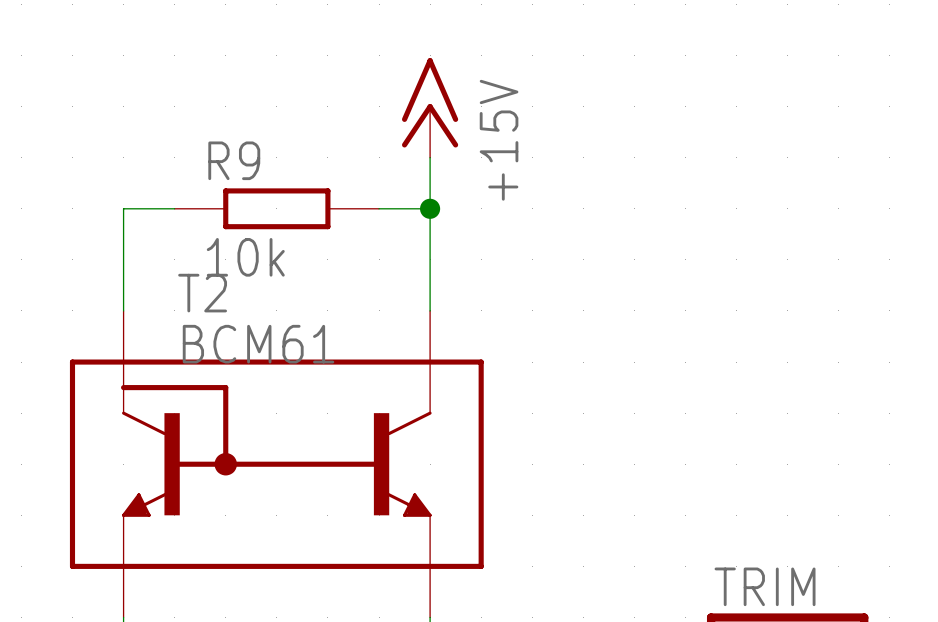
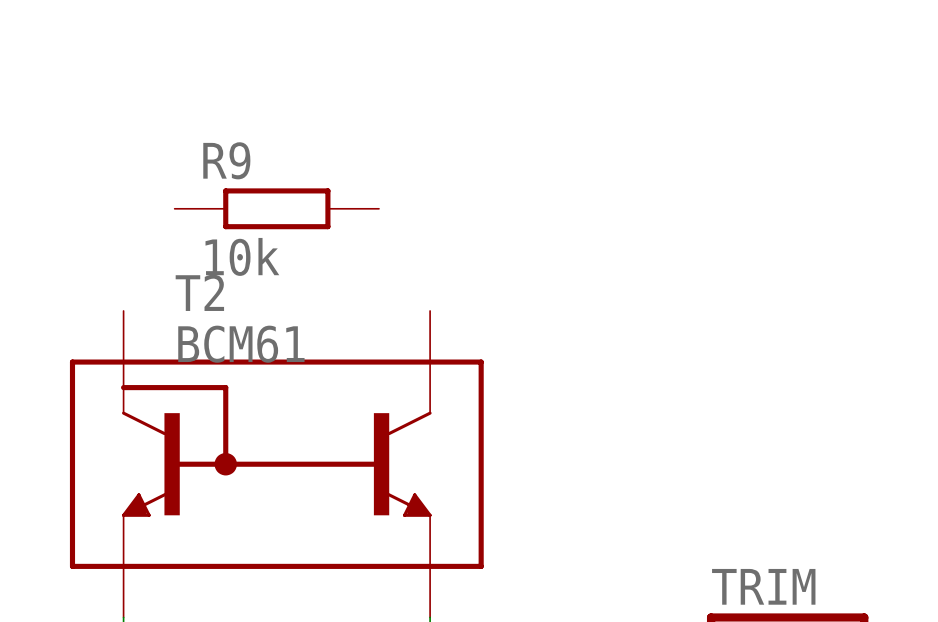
power symbol: +15V (430, 107) -> none
wire: (430, 157) (430, 310) -> none
wire: (174, 208) (123, 208) (123, 310) -> none
wire: (379, 208) (430, 208) -> none
junction: (430, 208) -> none

